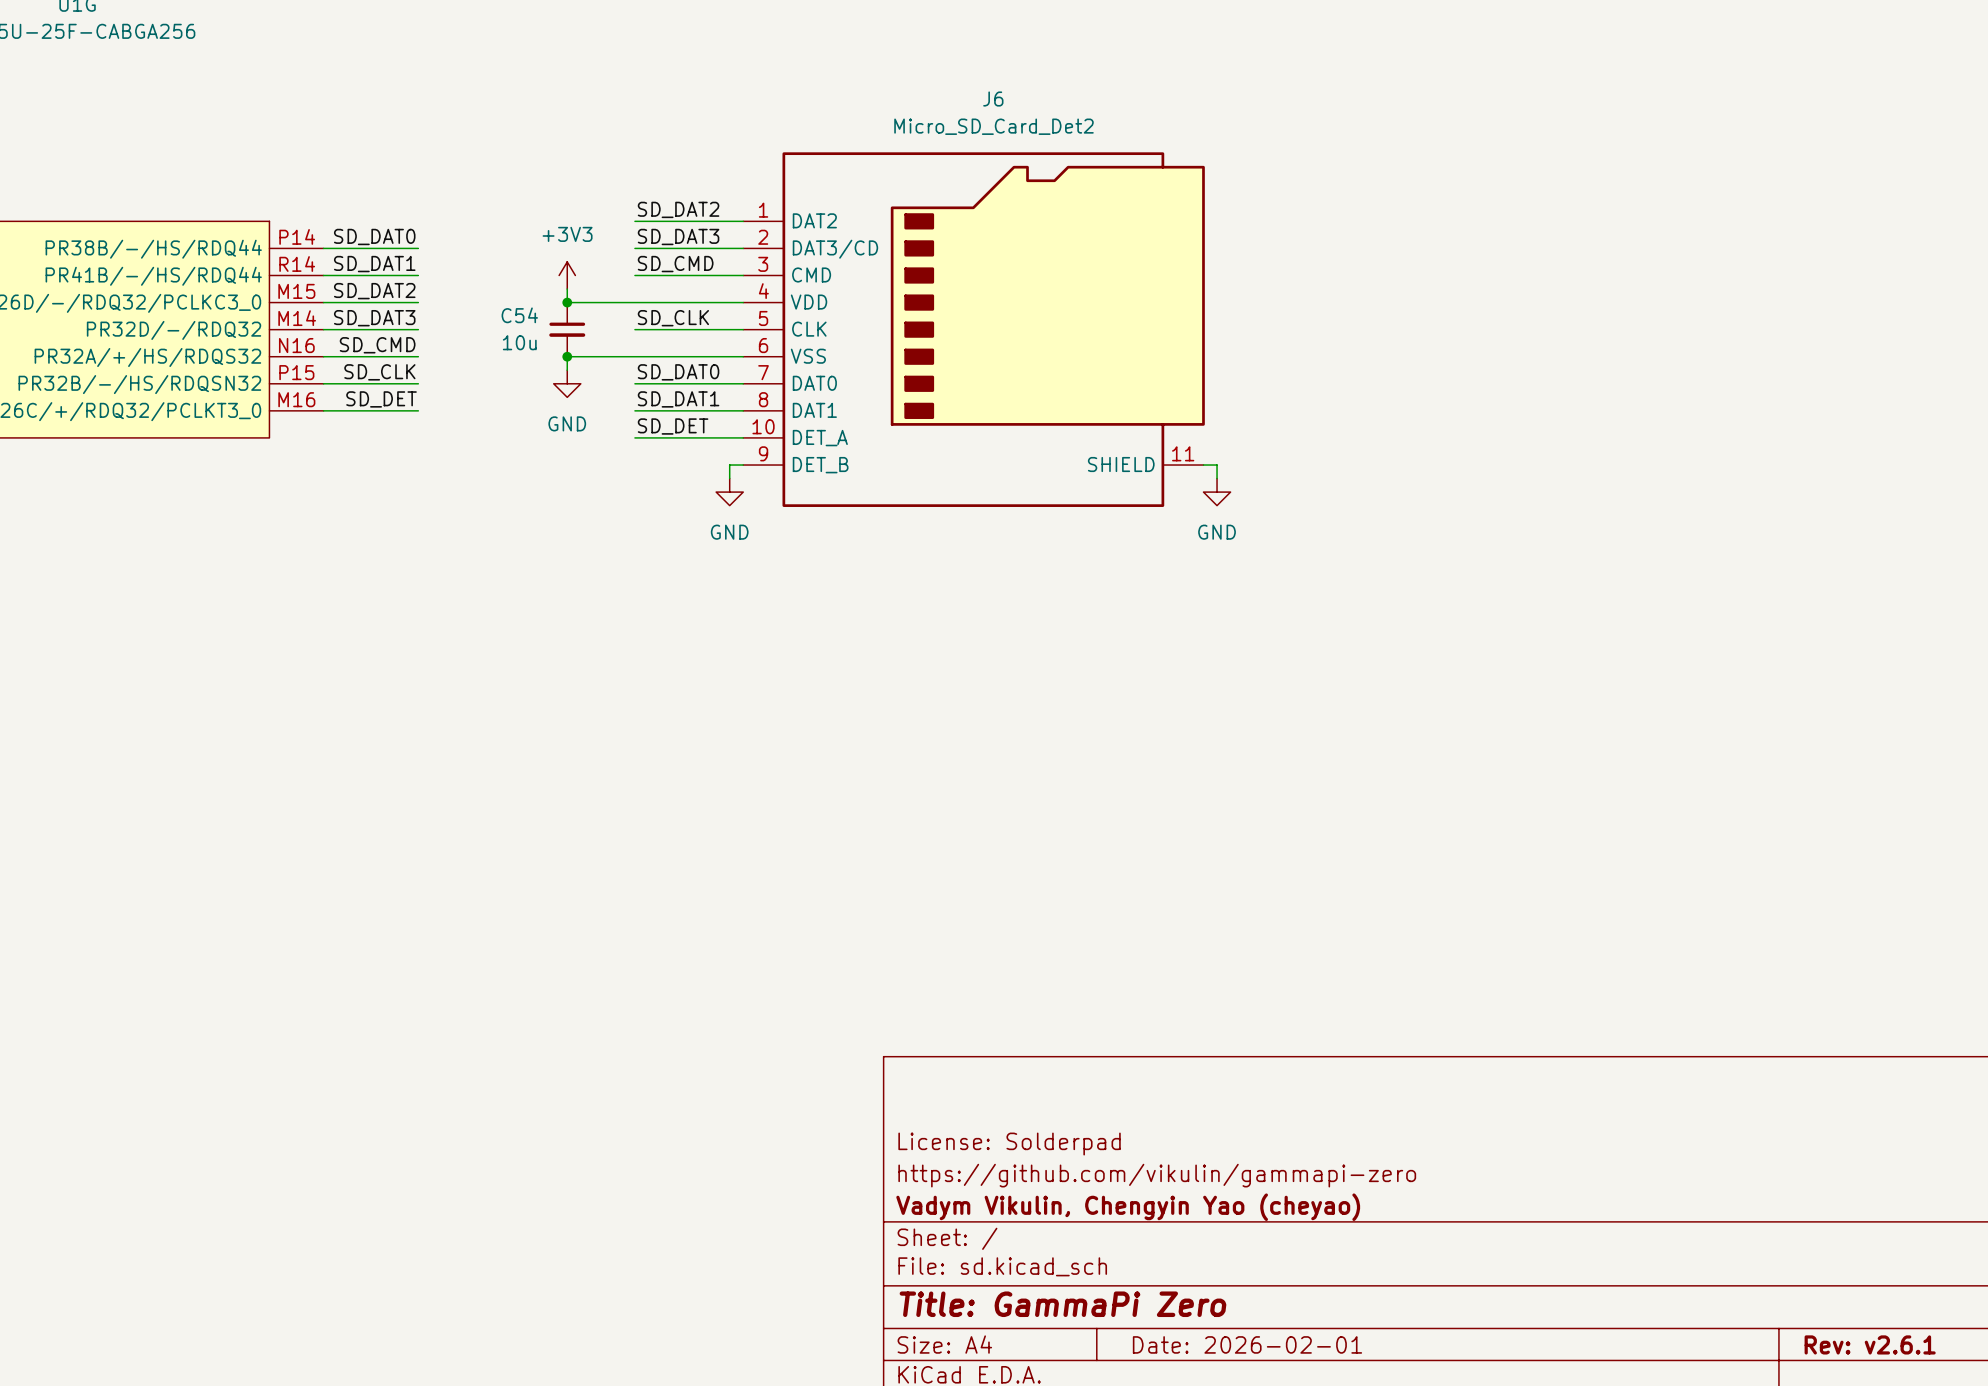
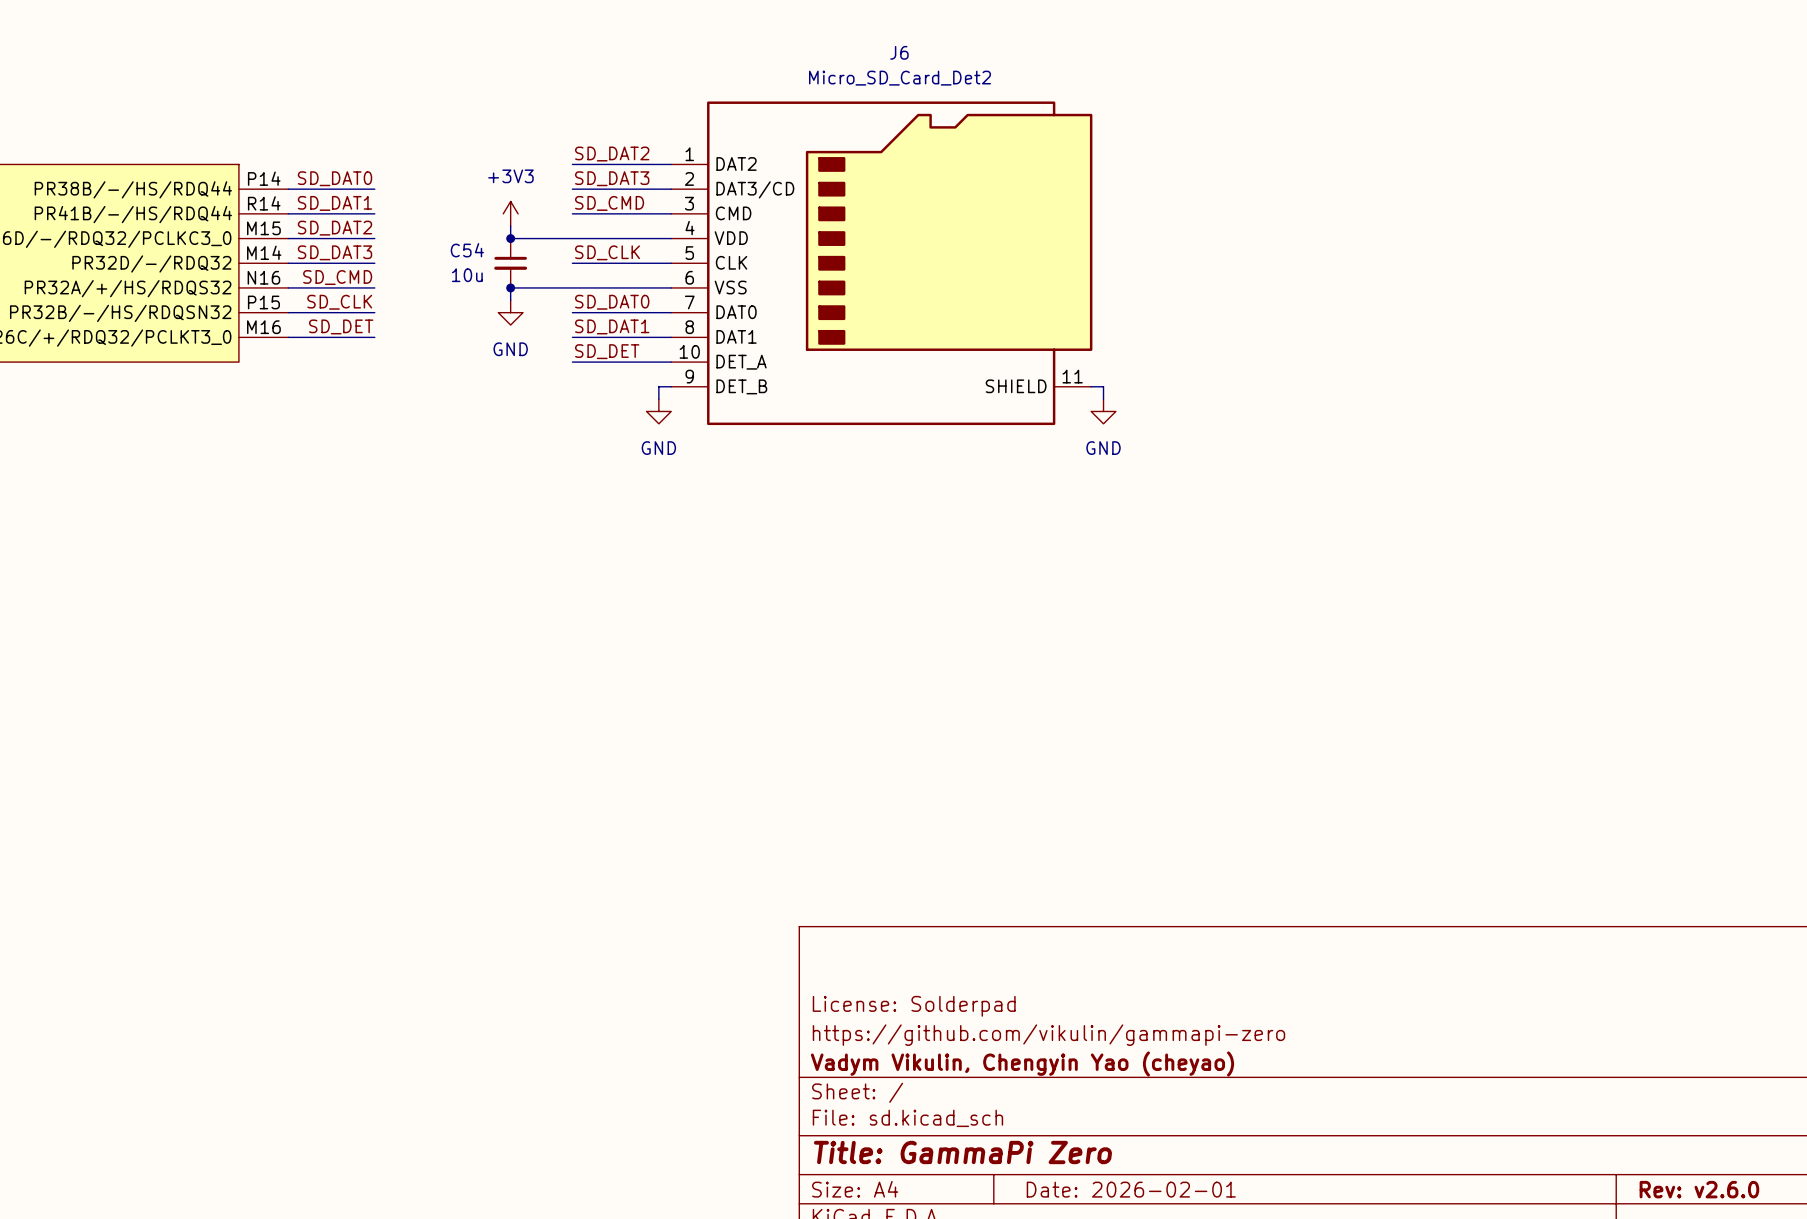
title block: Rev: v2.6.1 (1870, 1344) -> Rev: v2.6.0 (1699, 1189)

